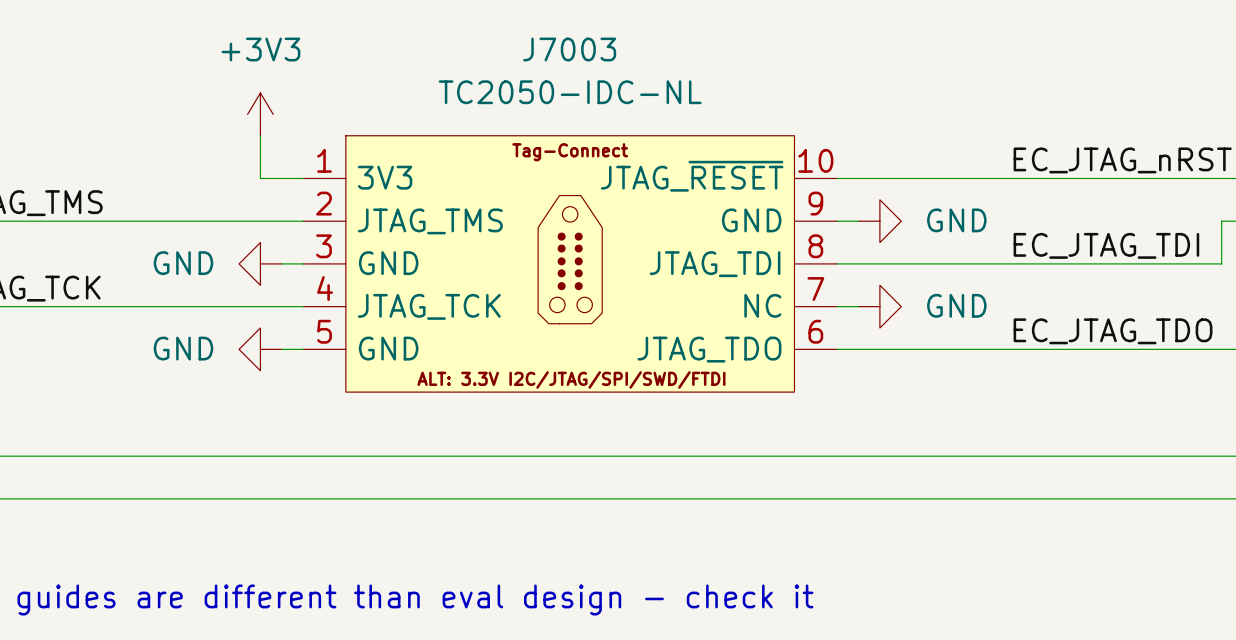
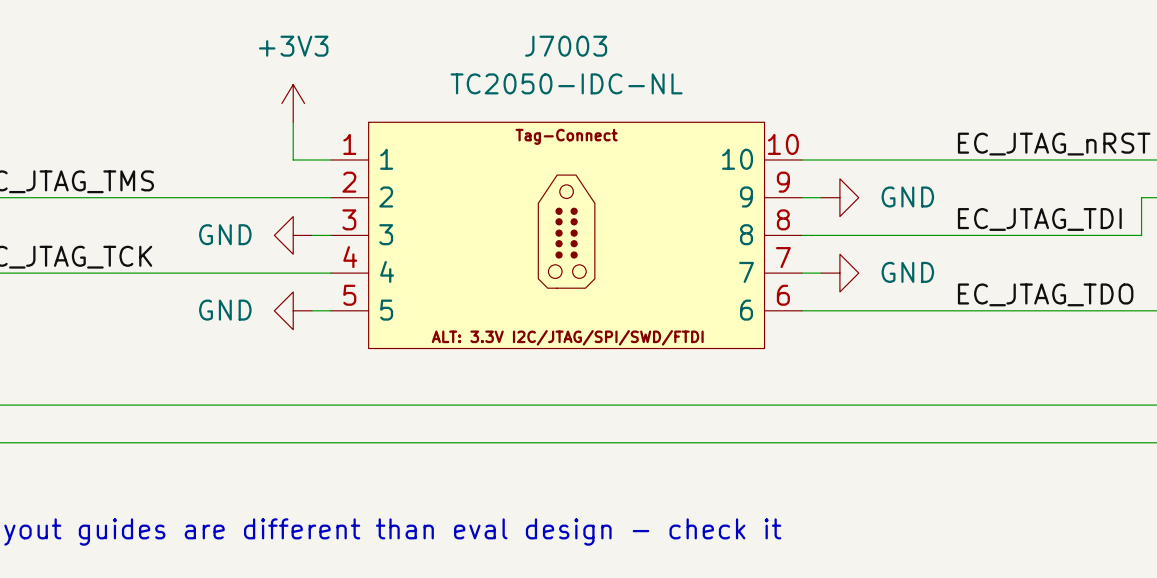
J7003 symbol: [303, 135, 838, 393] -> [330, 122, 803, 349]

